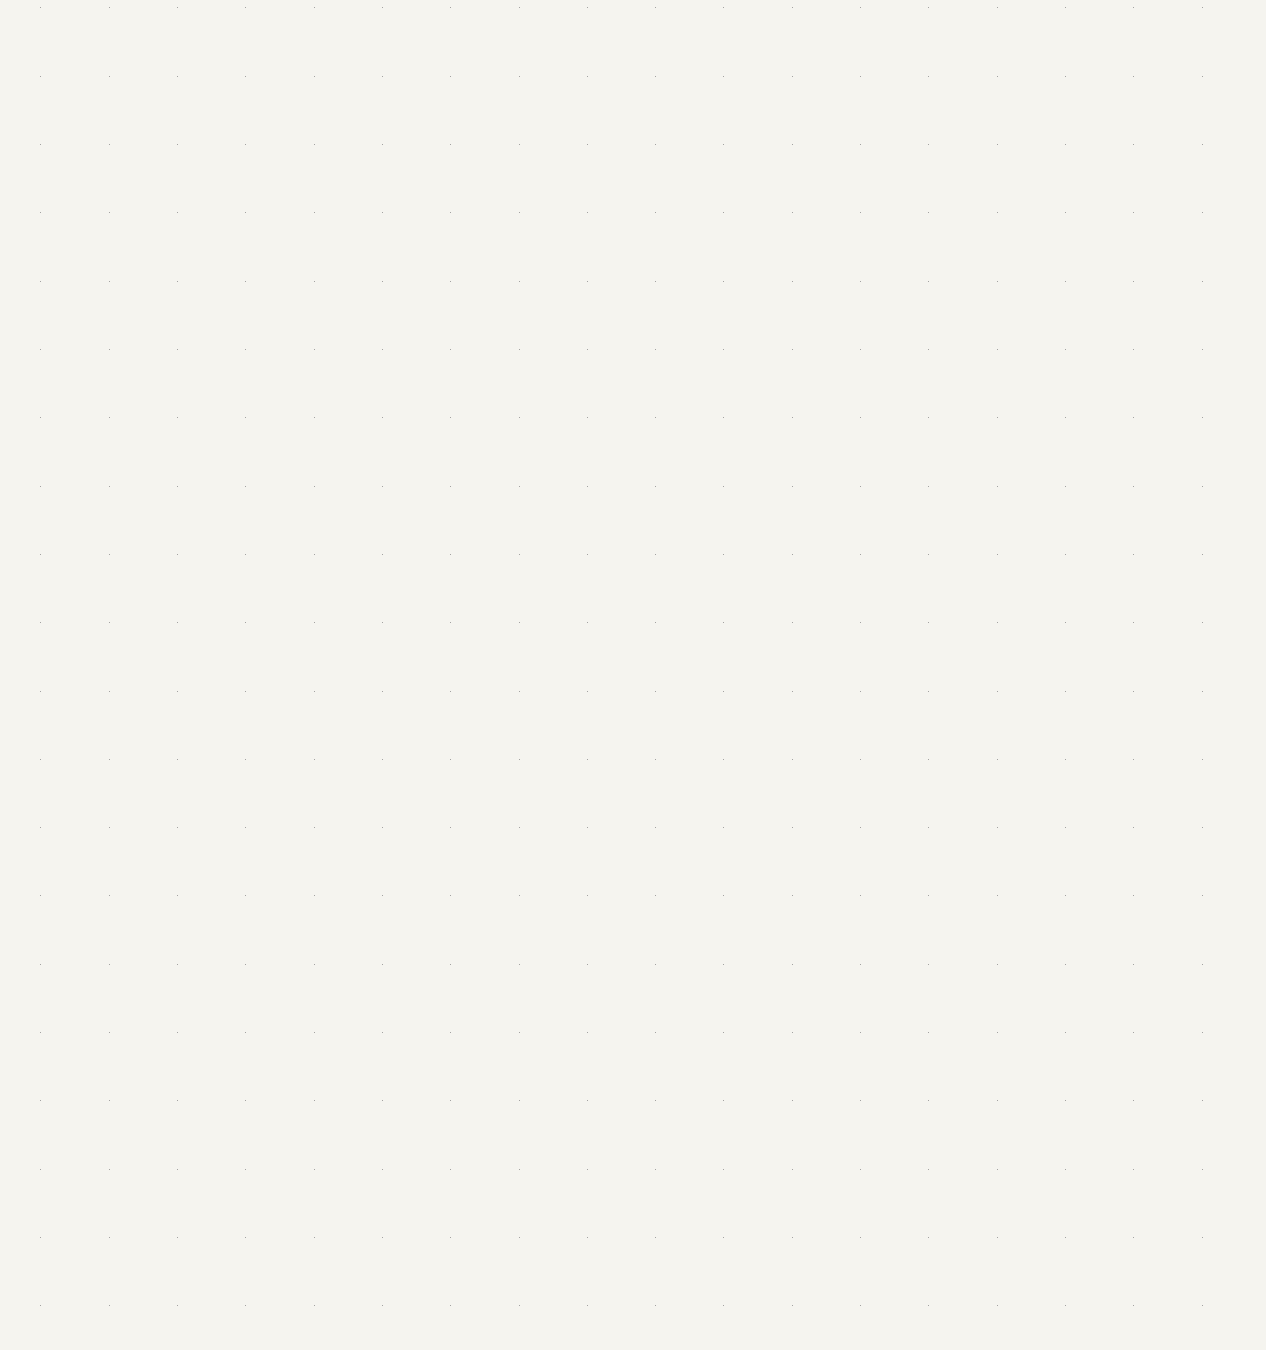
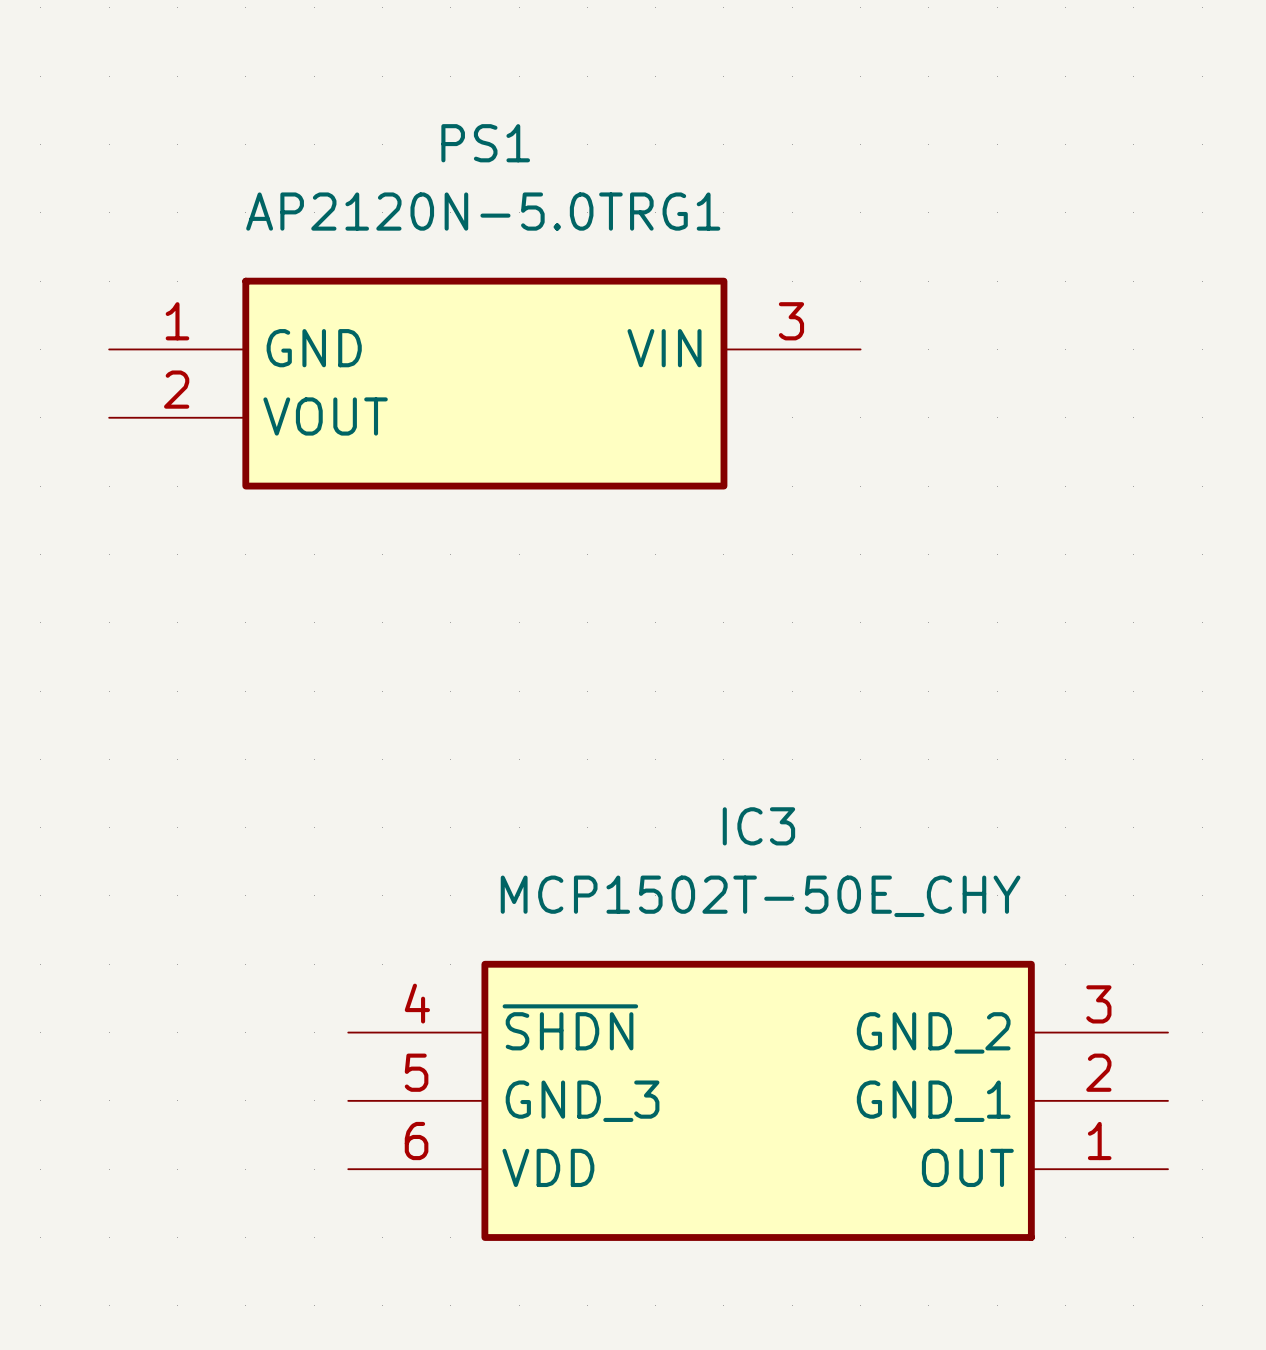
PS1: none -> AP2120N-5.0TRG1 (484, 383)
IC3: none -> MCP1502T-50E_CHY (758, 1100)

